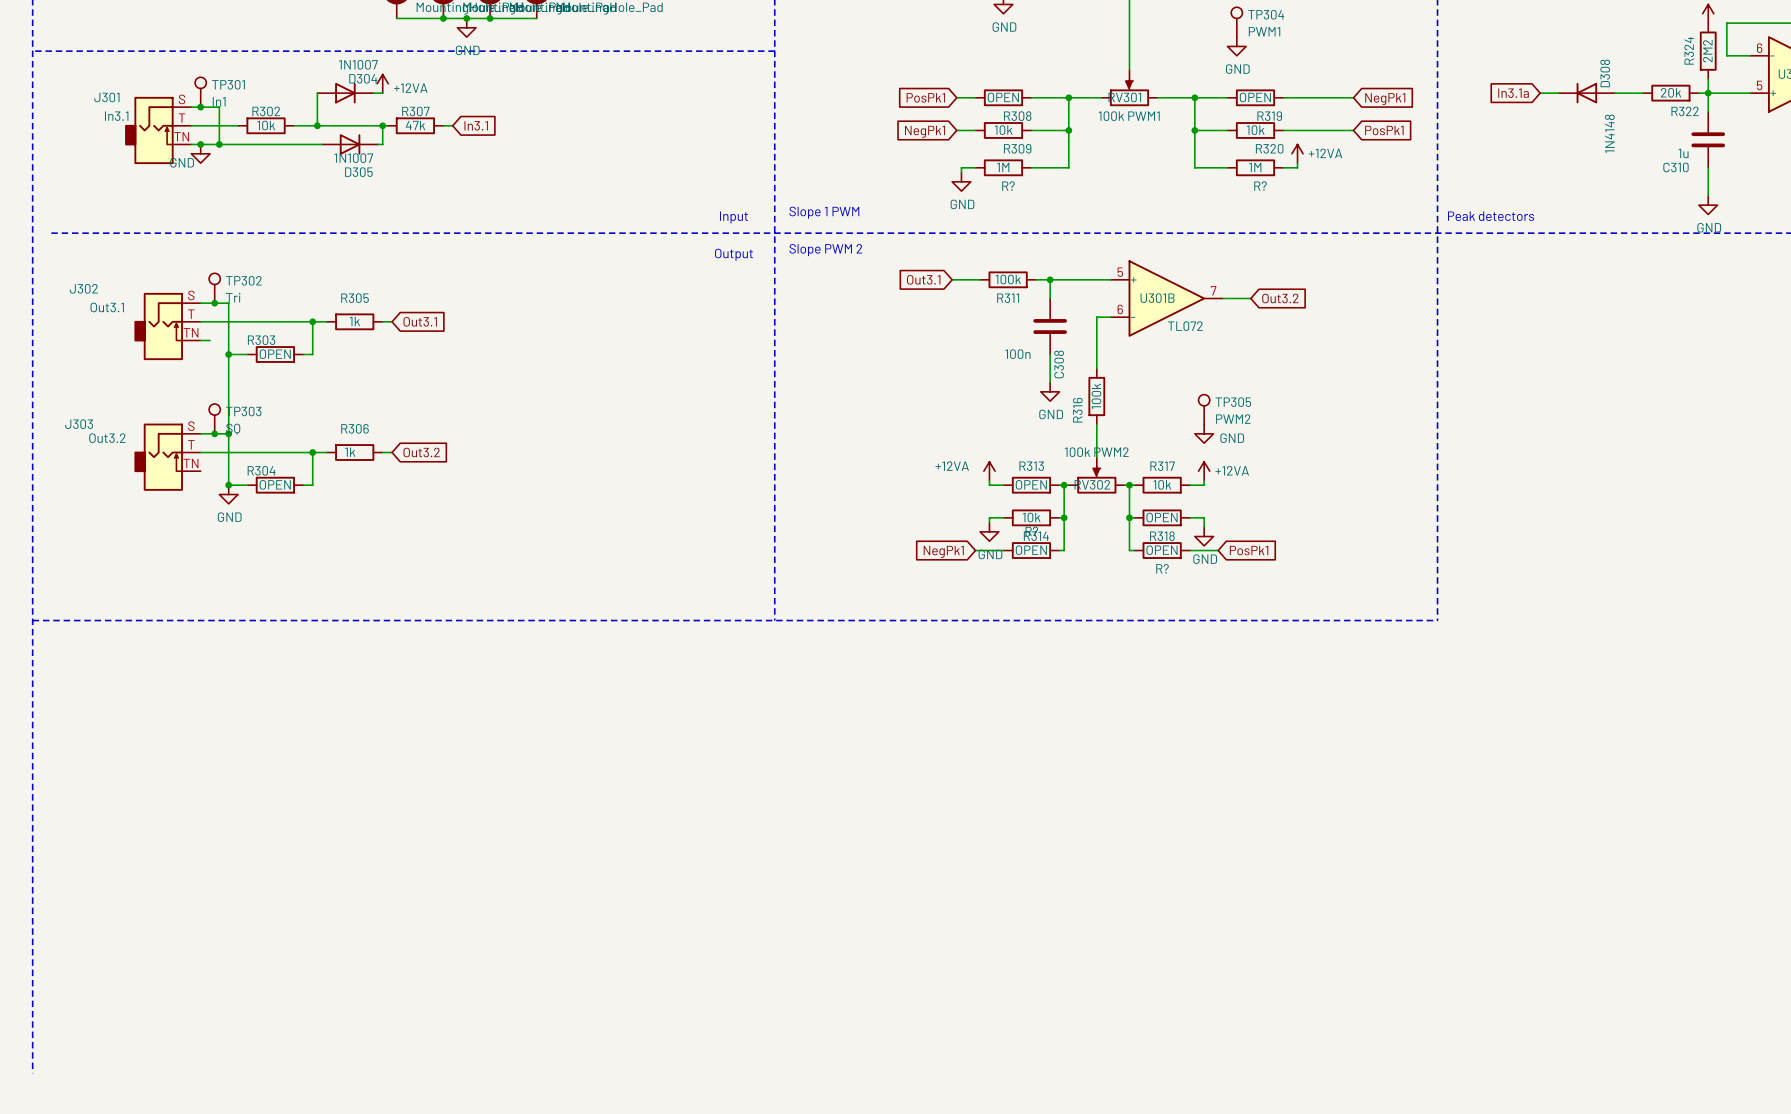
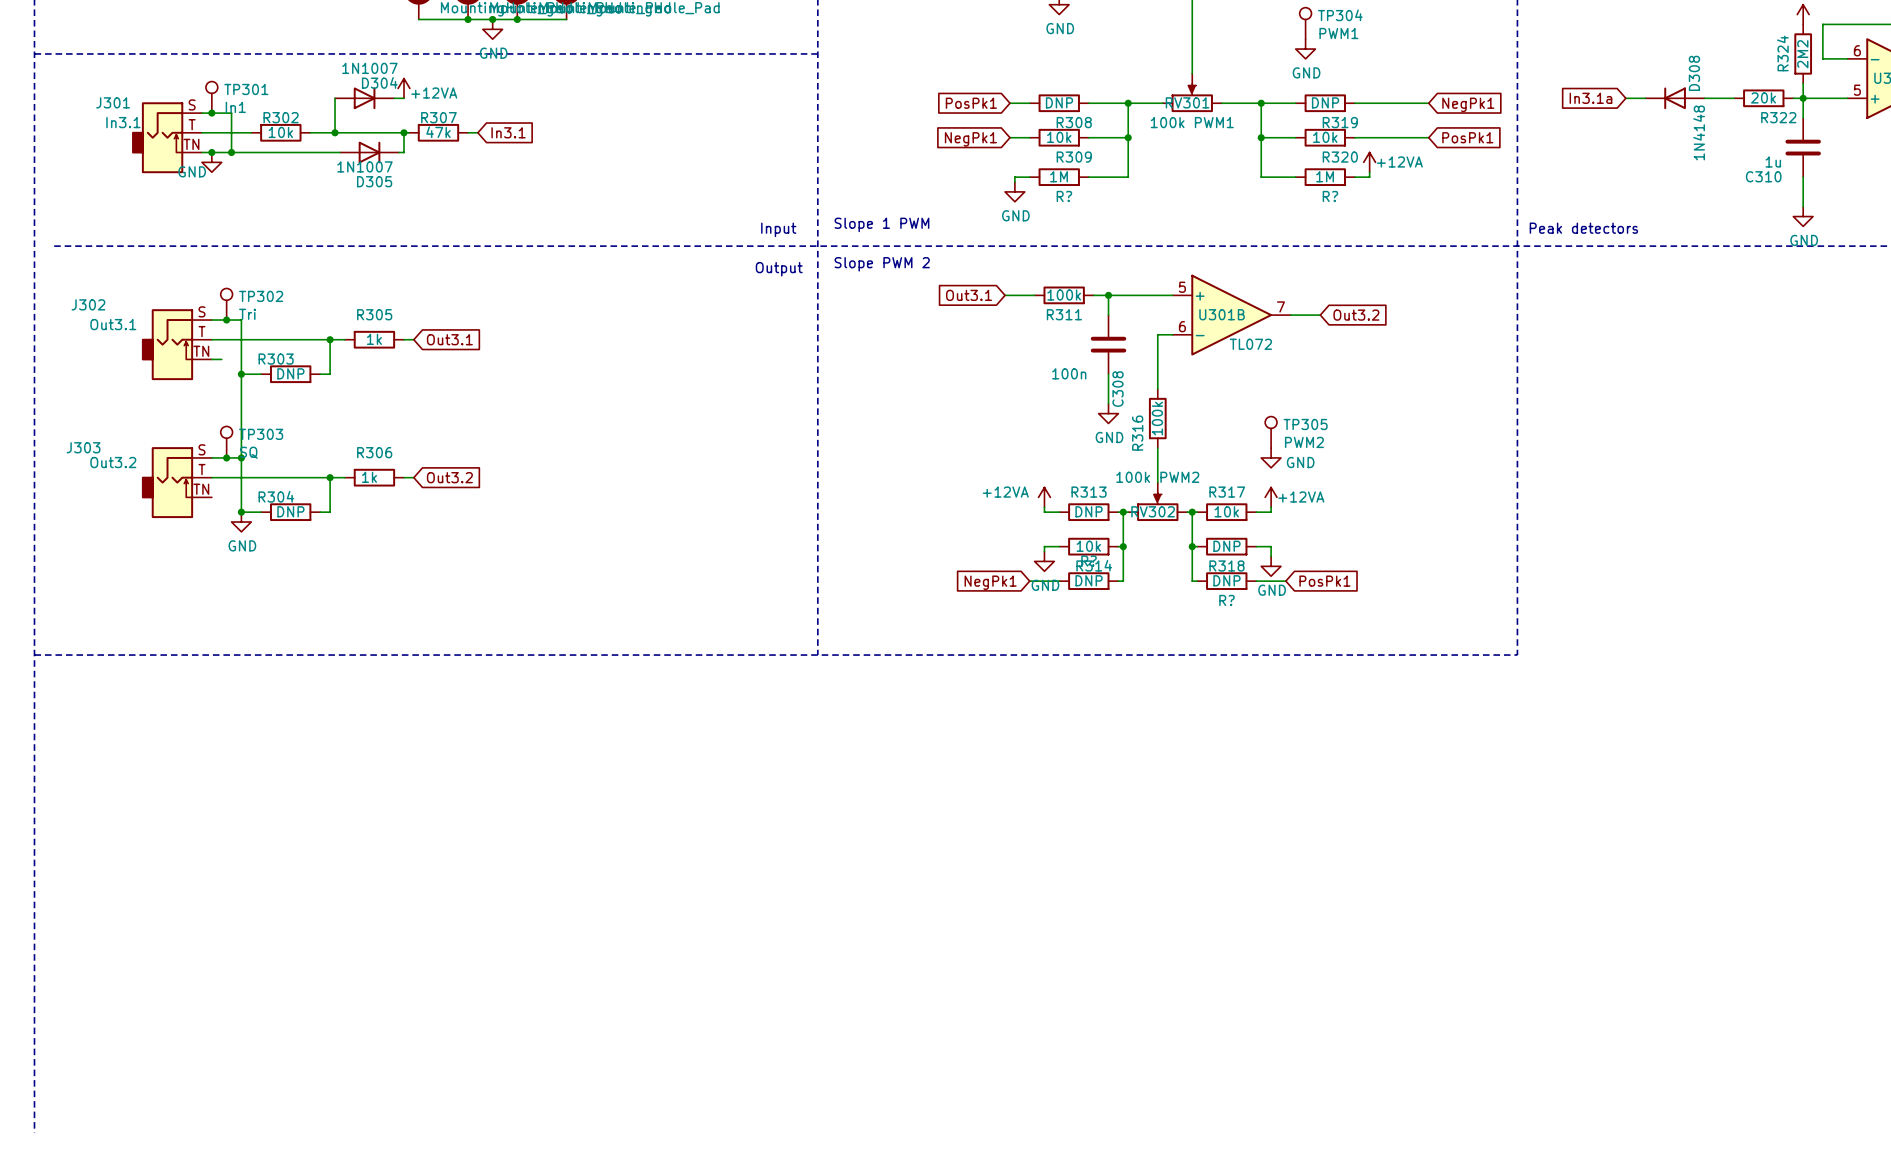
R308 value: OPEN (1003, 97) -> DNP (1059, 102)
R319 value: OPEN (1255, 97) -> DNP (1325, 102)
R303 value: OPEN (275, 354) -> DNP (290, 373)
R304 value: OPEN (275, 484) -> DNP (290, 511)
R313 value: OPEN (1031, 484) -> DNP (1089, 511)
R318 value: OPEN (1162, 517) -> DNP (1226, 546)
R? value: OPEN (1031, 550) -> DNP (1089, 580)
R? value: OPEN (1162, 550) -> DNP (1226, 580)

